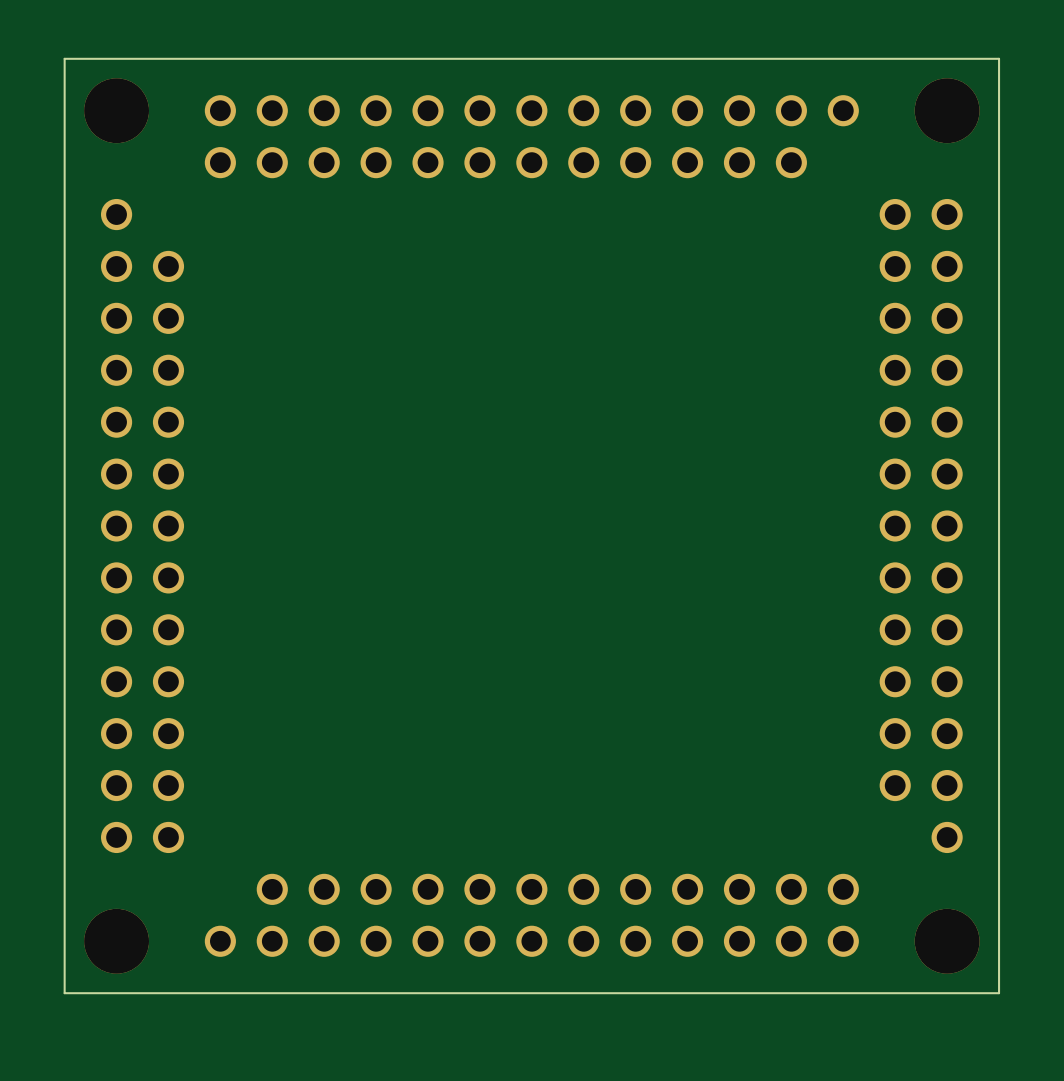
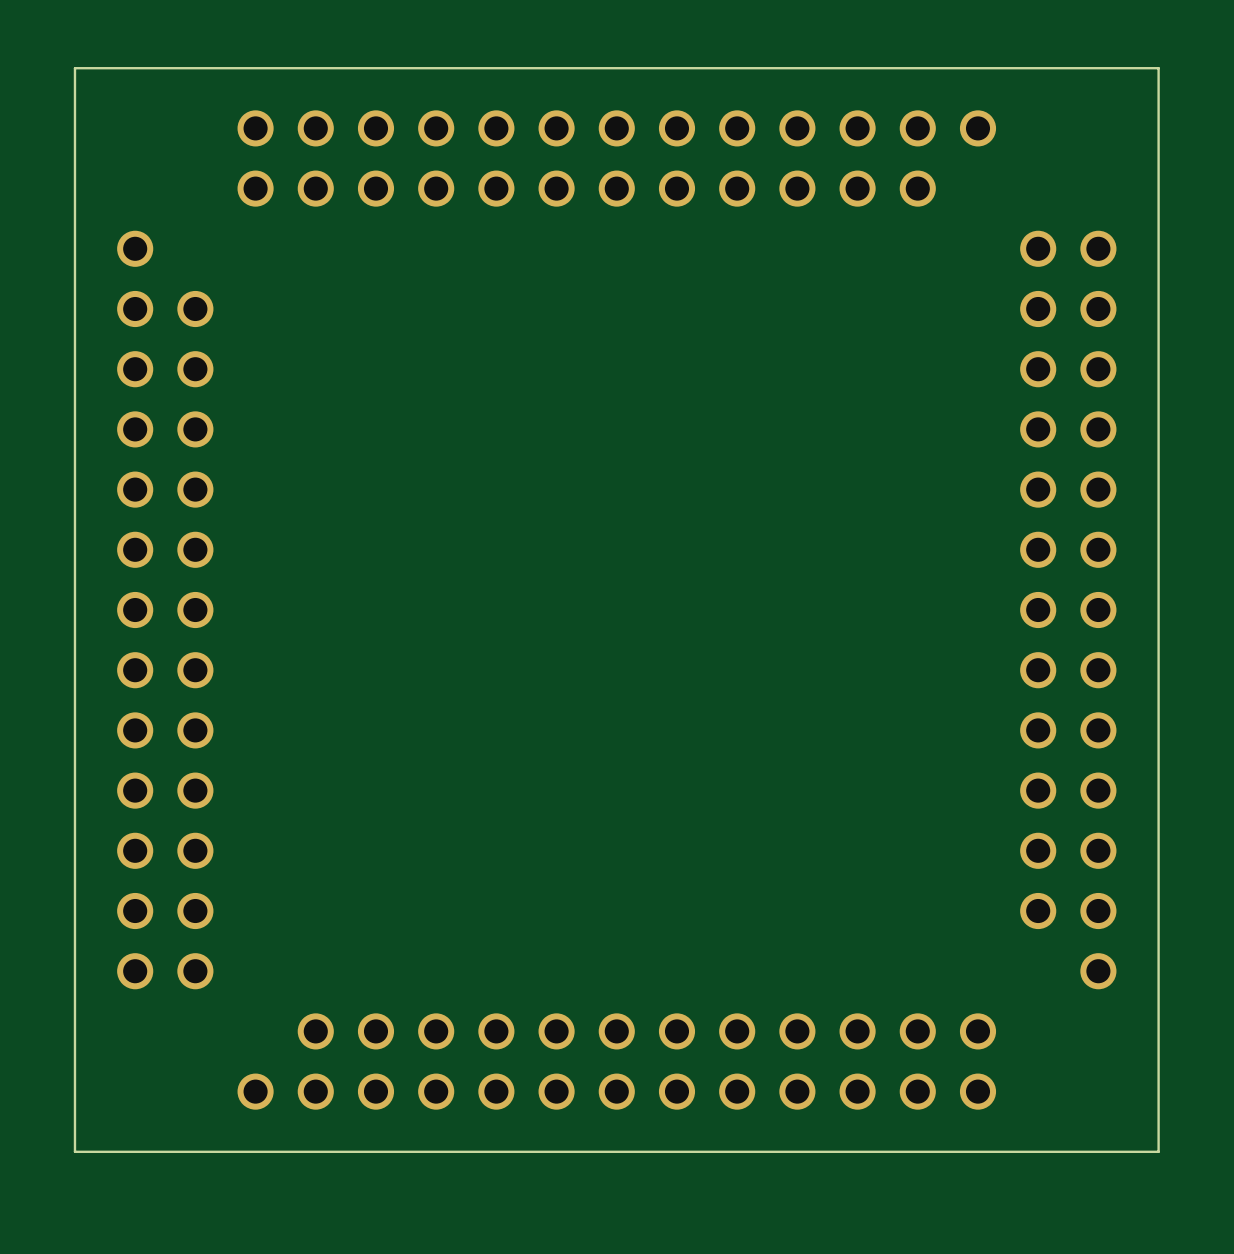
part: (116, 110) -> none
part: (947, 110) -> none
part: (116, 941) -> none
part: (947, 941) -> none

